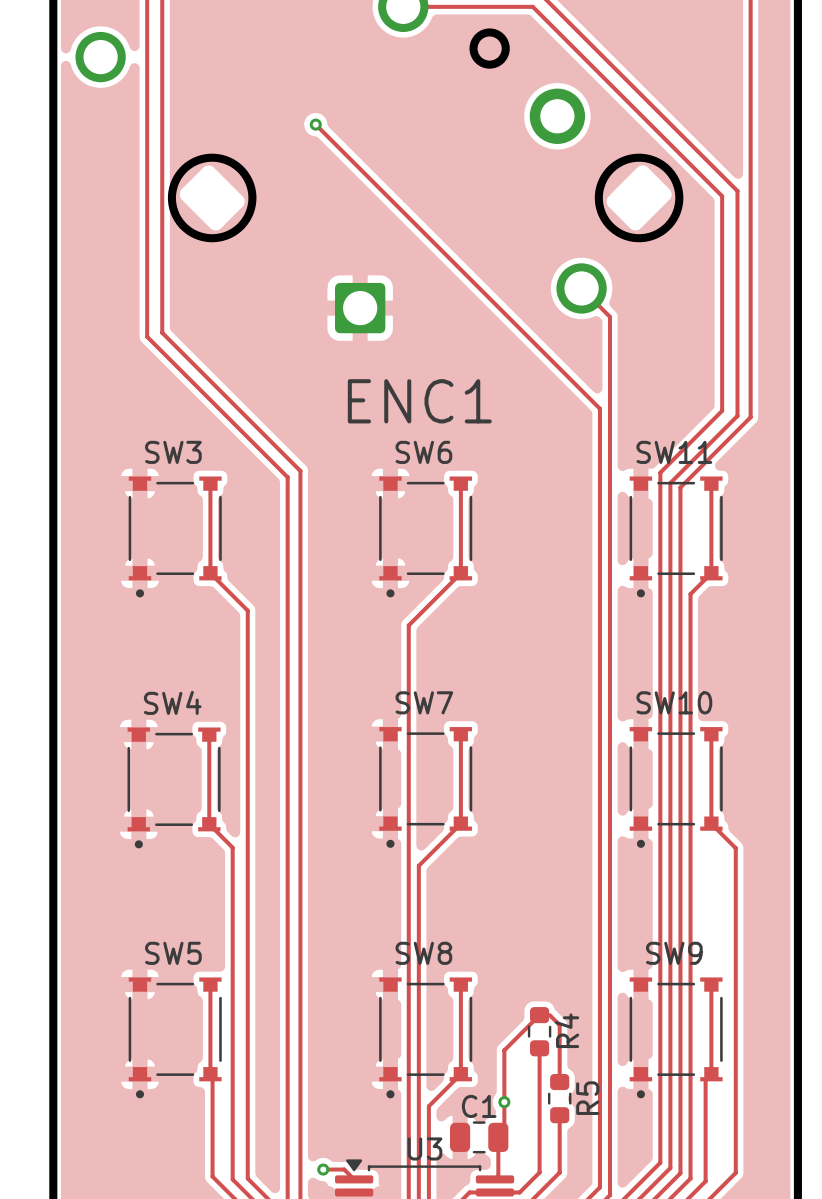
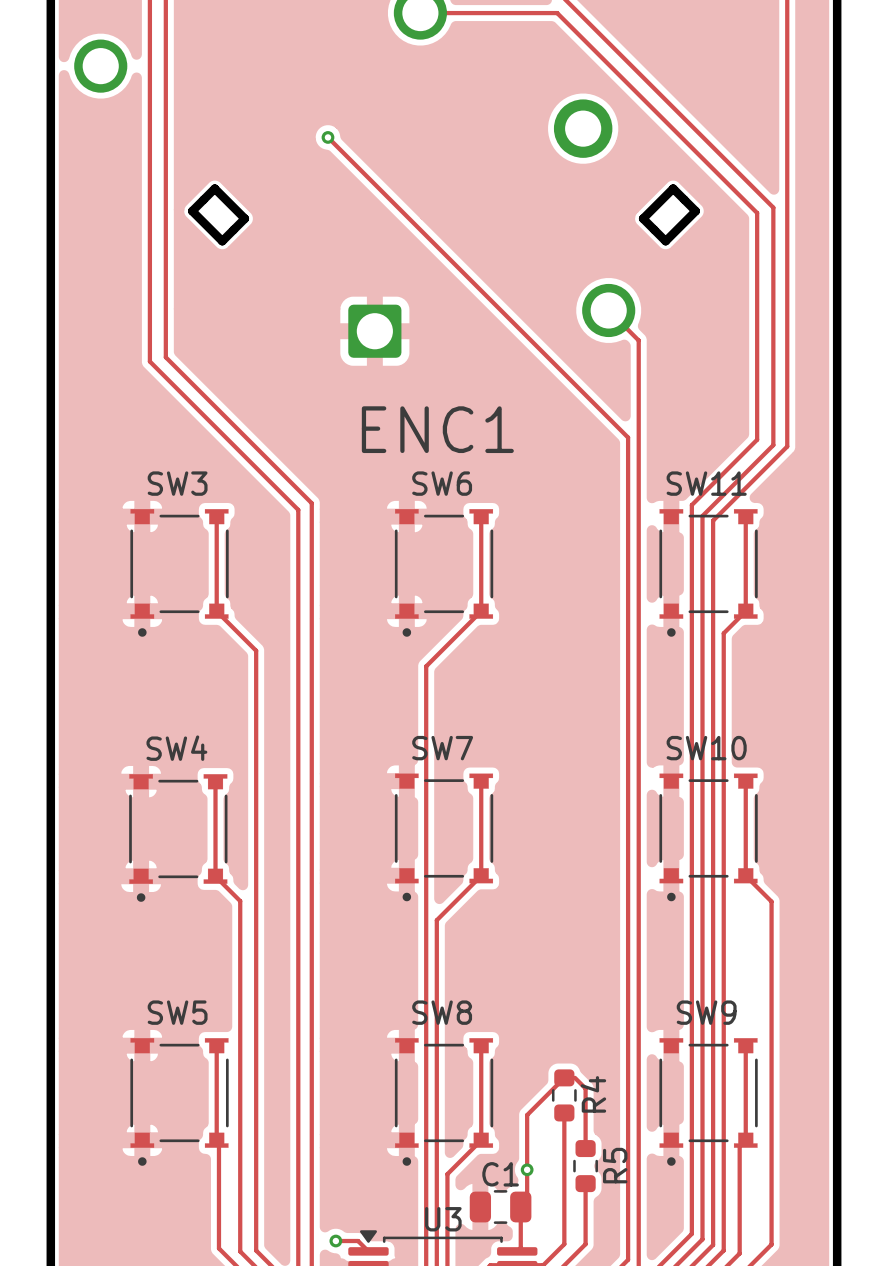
round board edge: [469, 28, 510, 69] -> none
round board edge: [167, 153, 257, 243] -> none
round board edge: [594, 153, 684, 243] -> none
board edge: none -> (214, 188) (192, 211) (222, 241) (244, 218) (214, 188)
board edge: none -> (673, 188) (643, 218) (665, 241) (695, 211) (673, 188)

